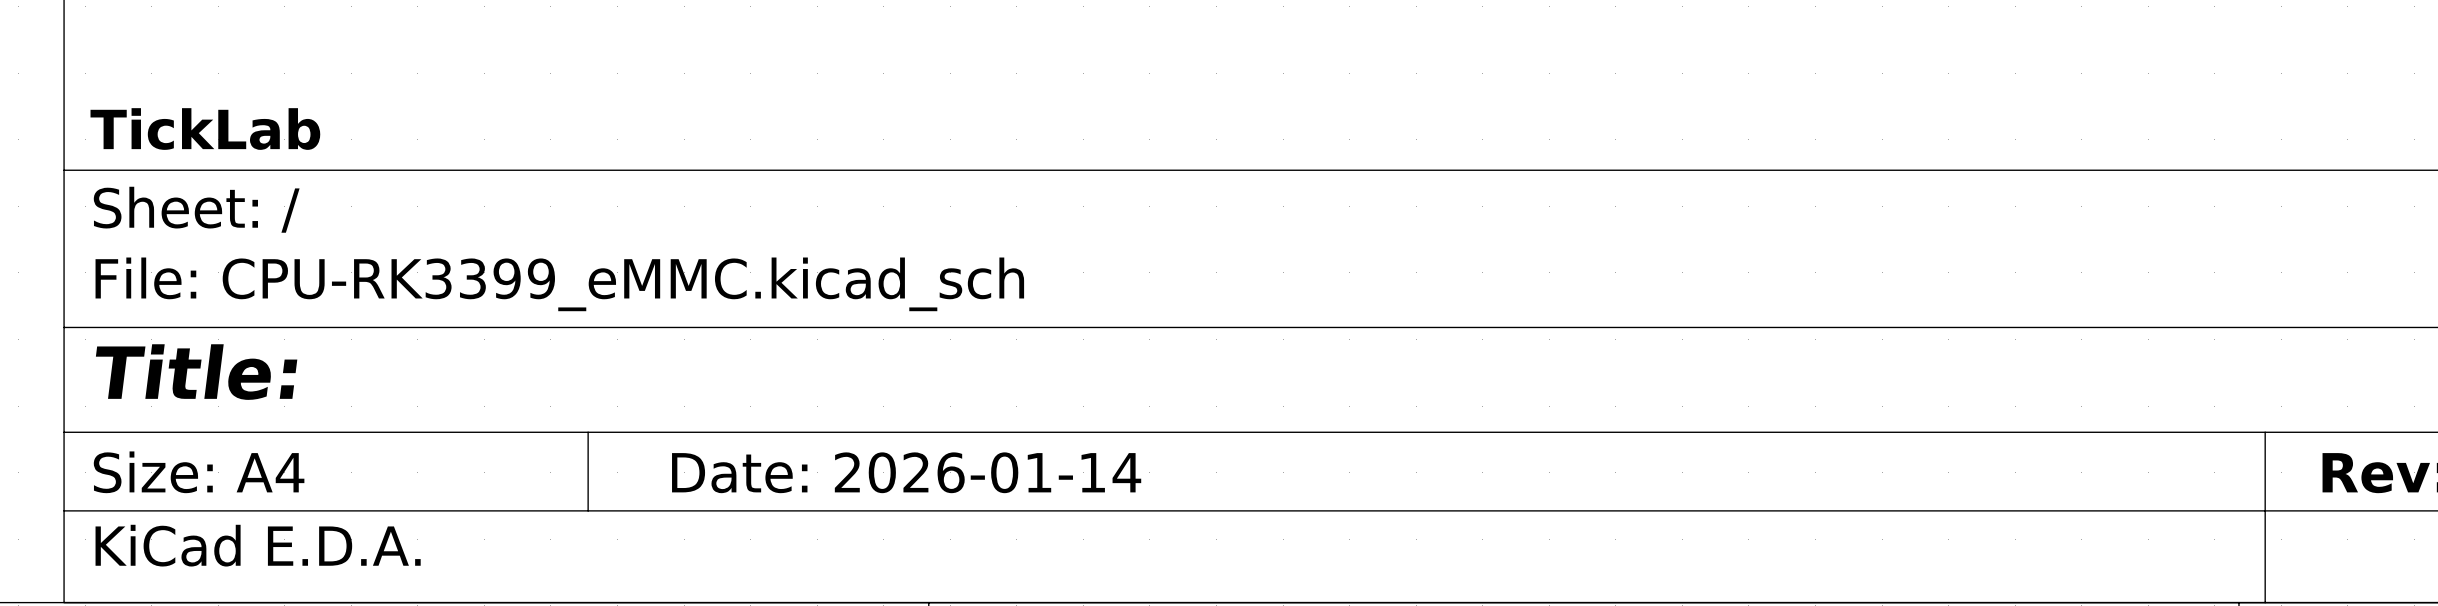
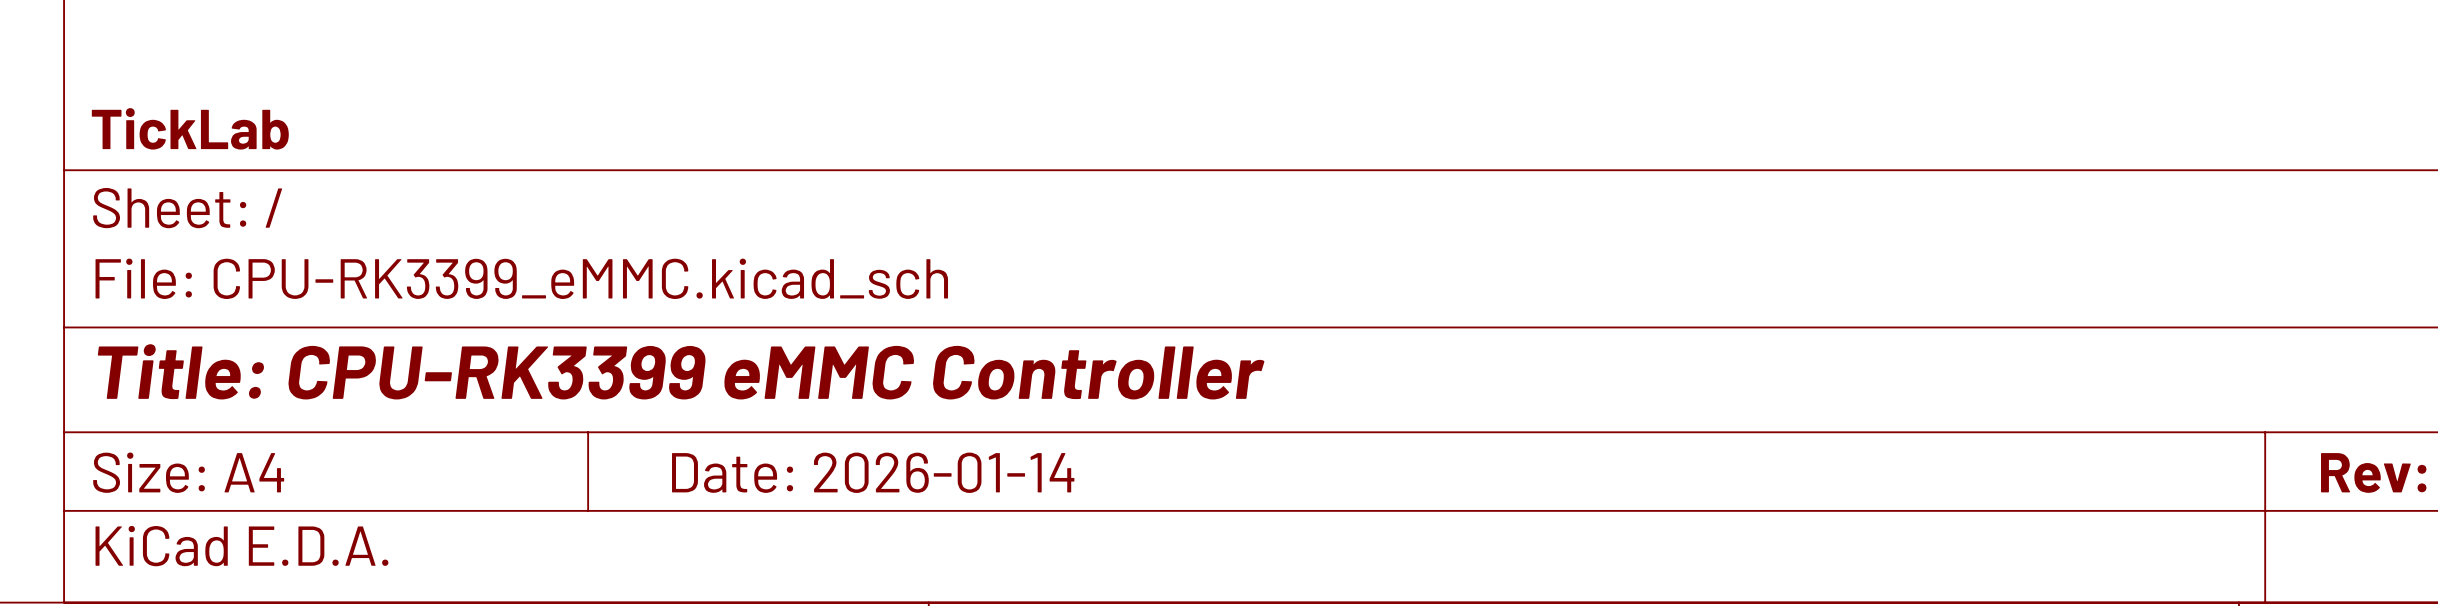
title block: Title: (196, 372) -> Title: CPU-RK3399 eMMC Controller (681, 371)

